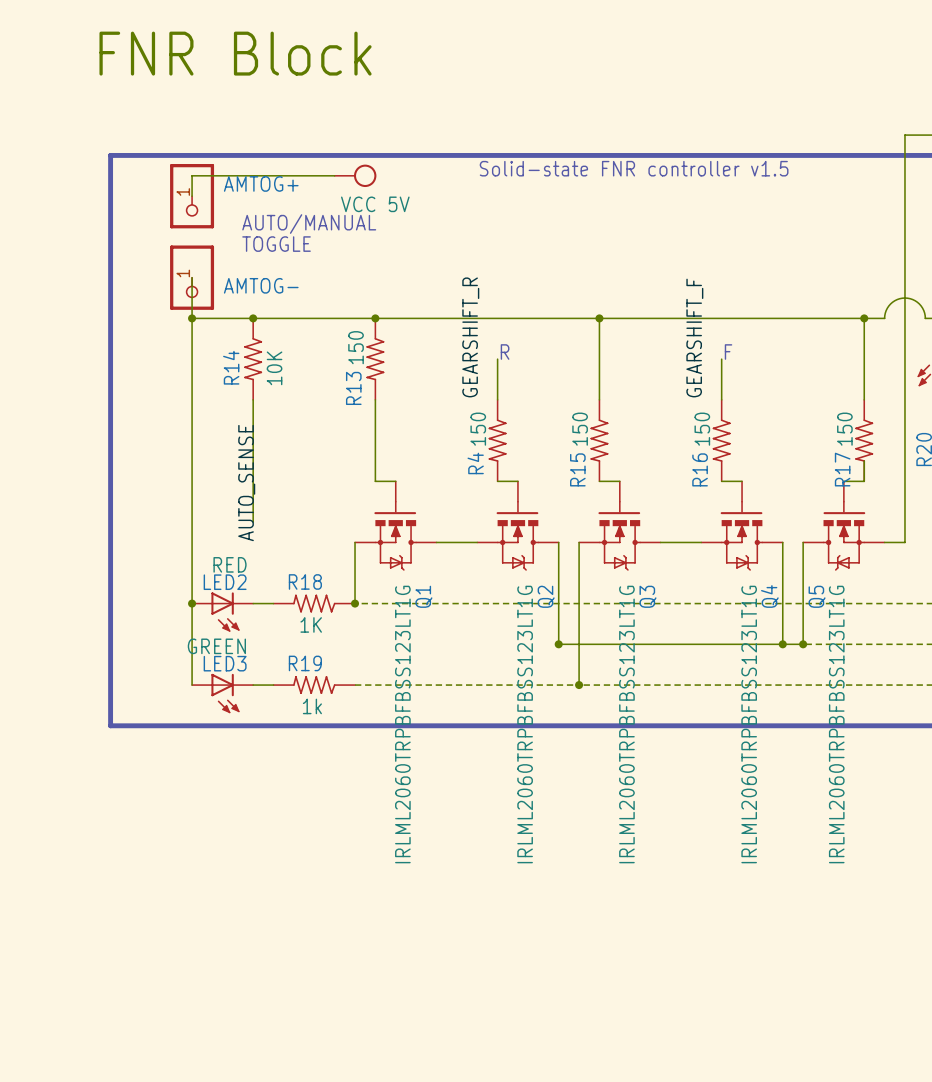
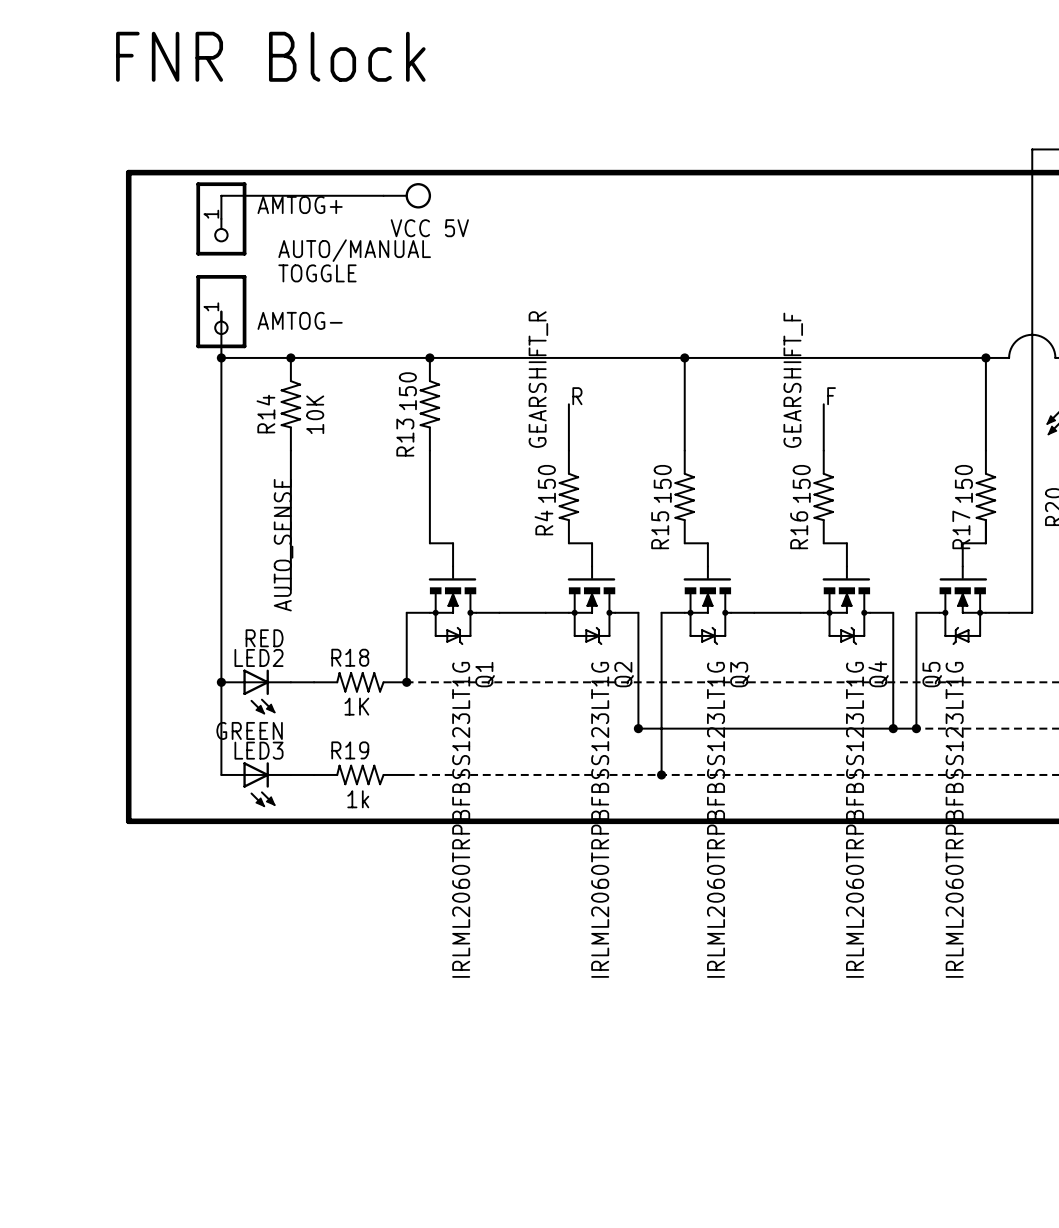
text: Solid-state FNR controller v1.5 (634, 168) -> none

